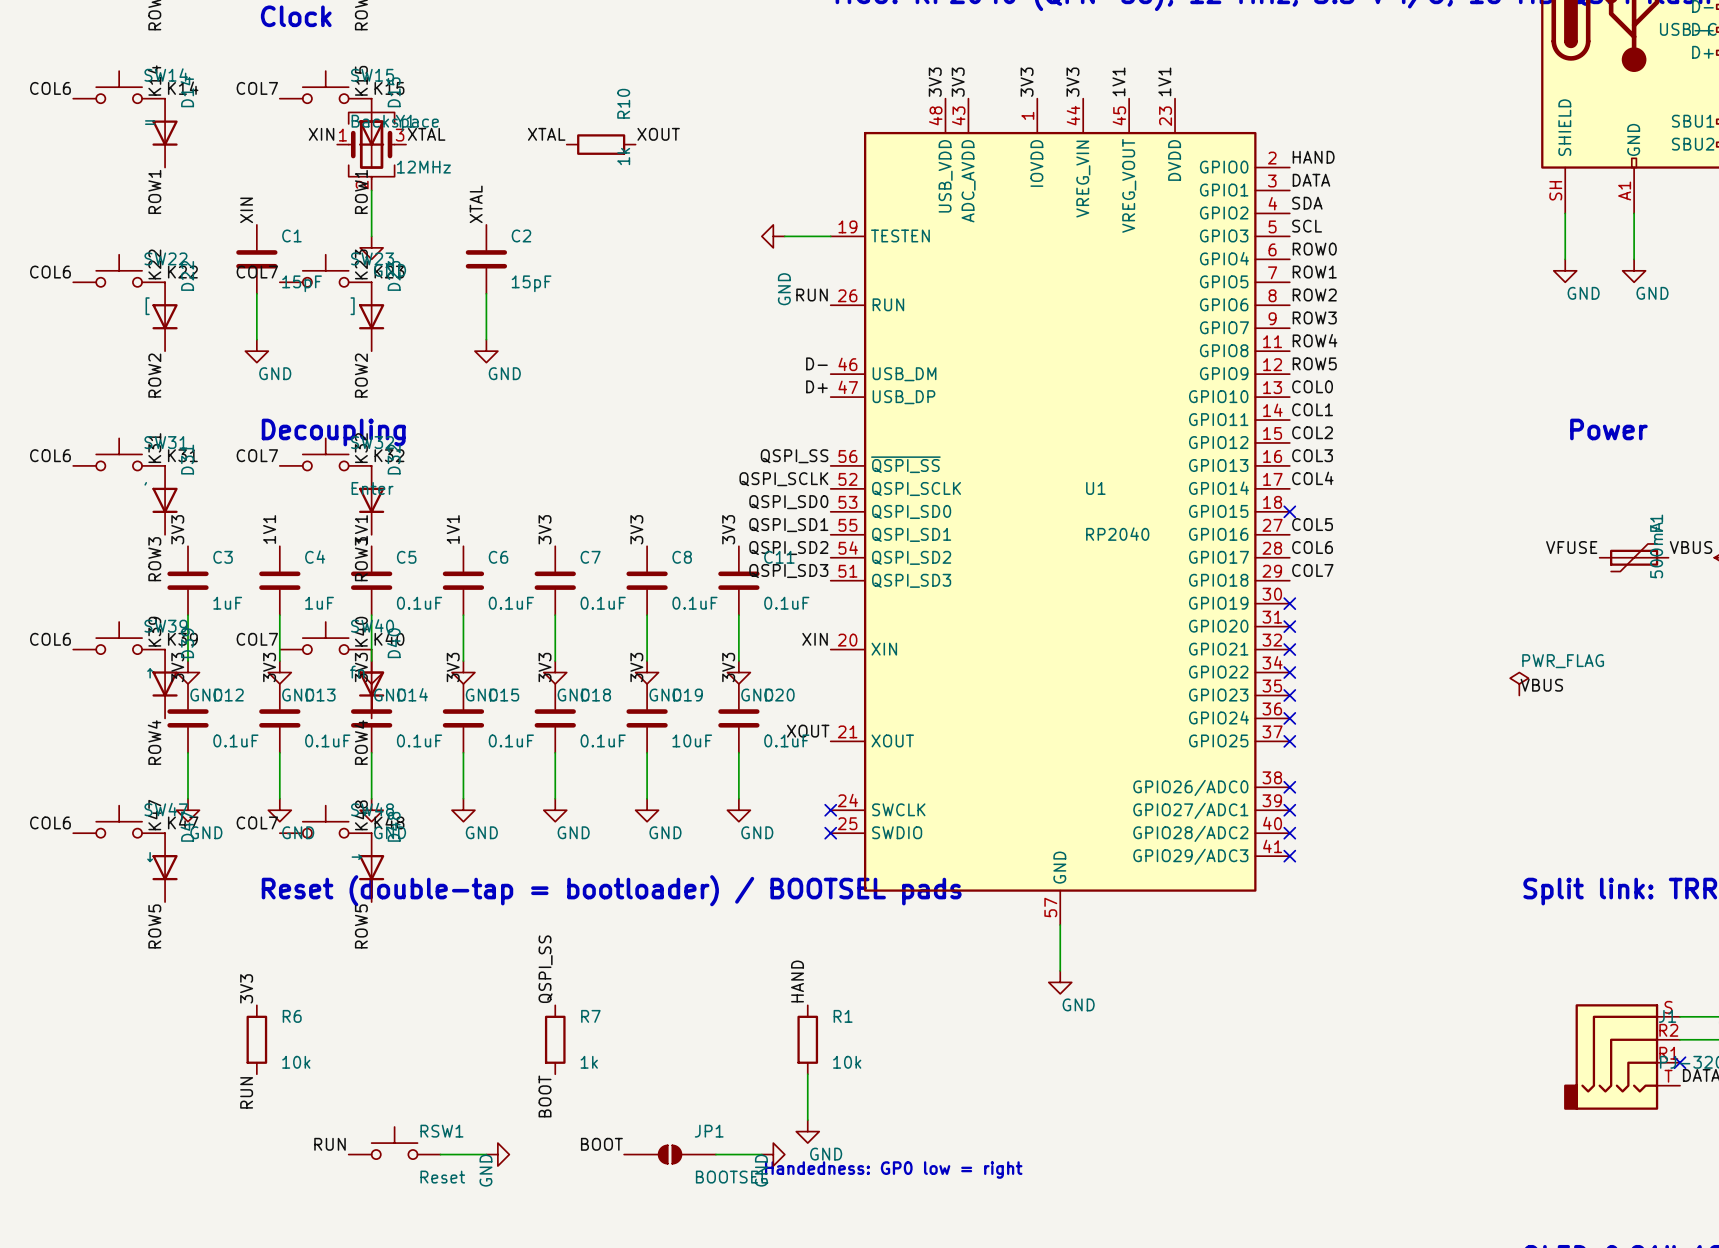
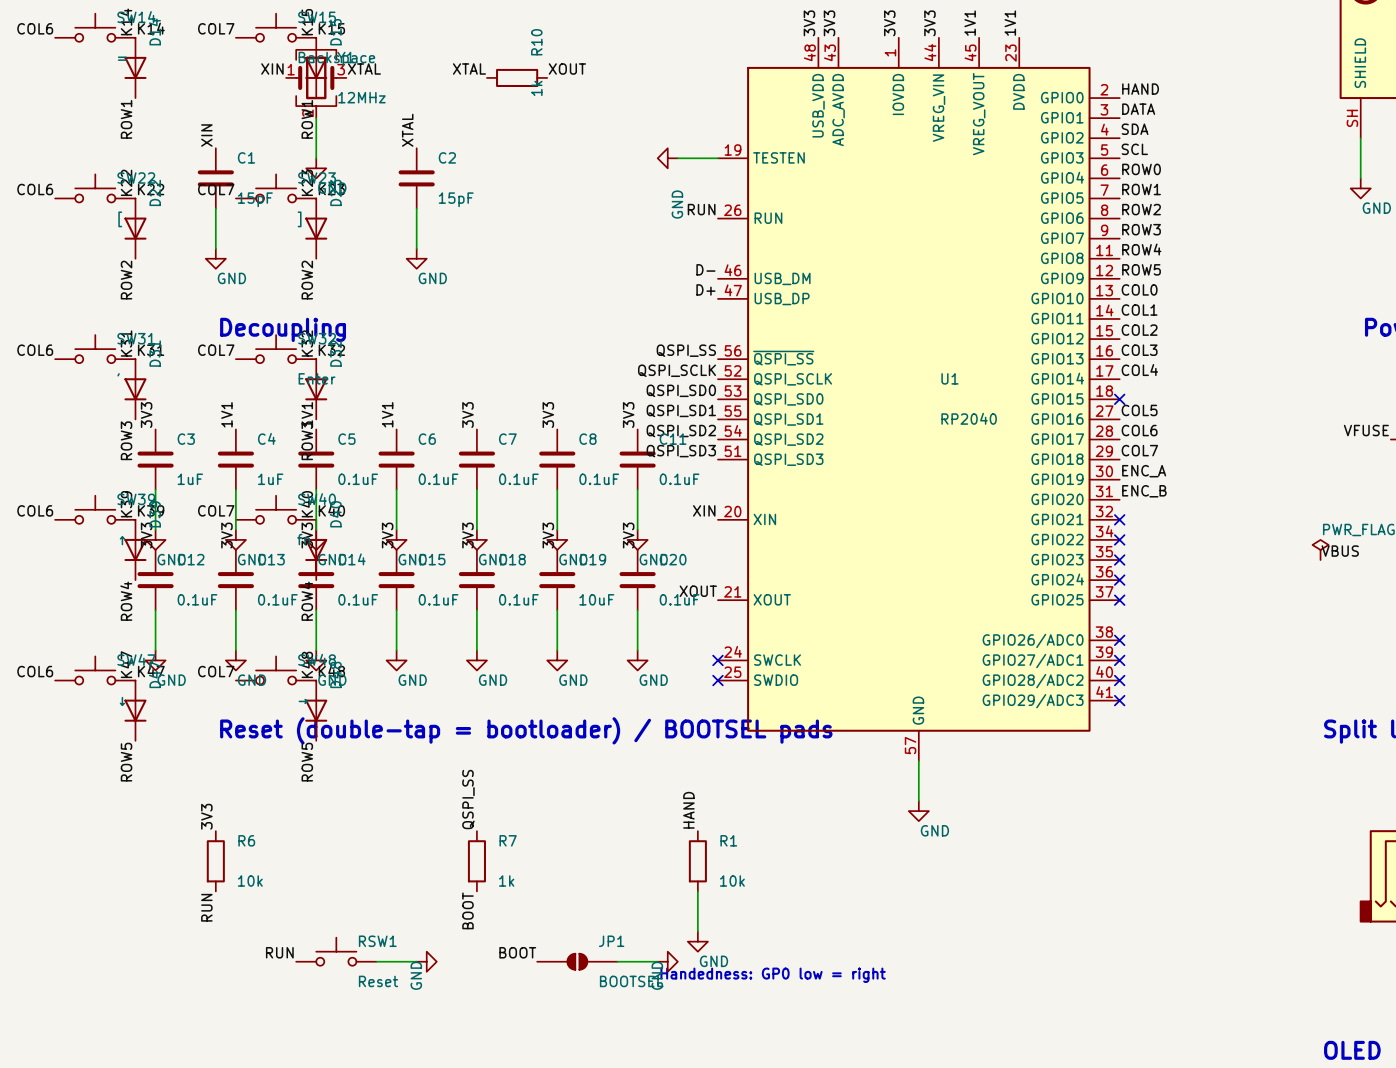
label: none -> ENC_A (1144, 471)
no-connect mark: (1289, 603) -> none
label: none -> ENC_B (1144, 491)
no-connect mark: (1289, 626) -> none

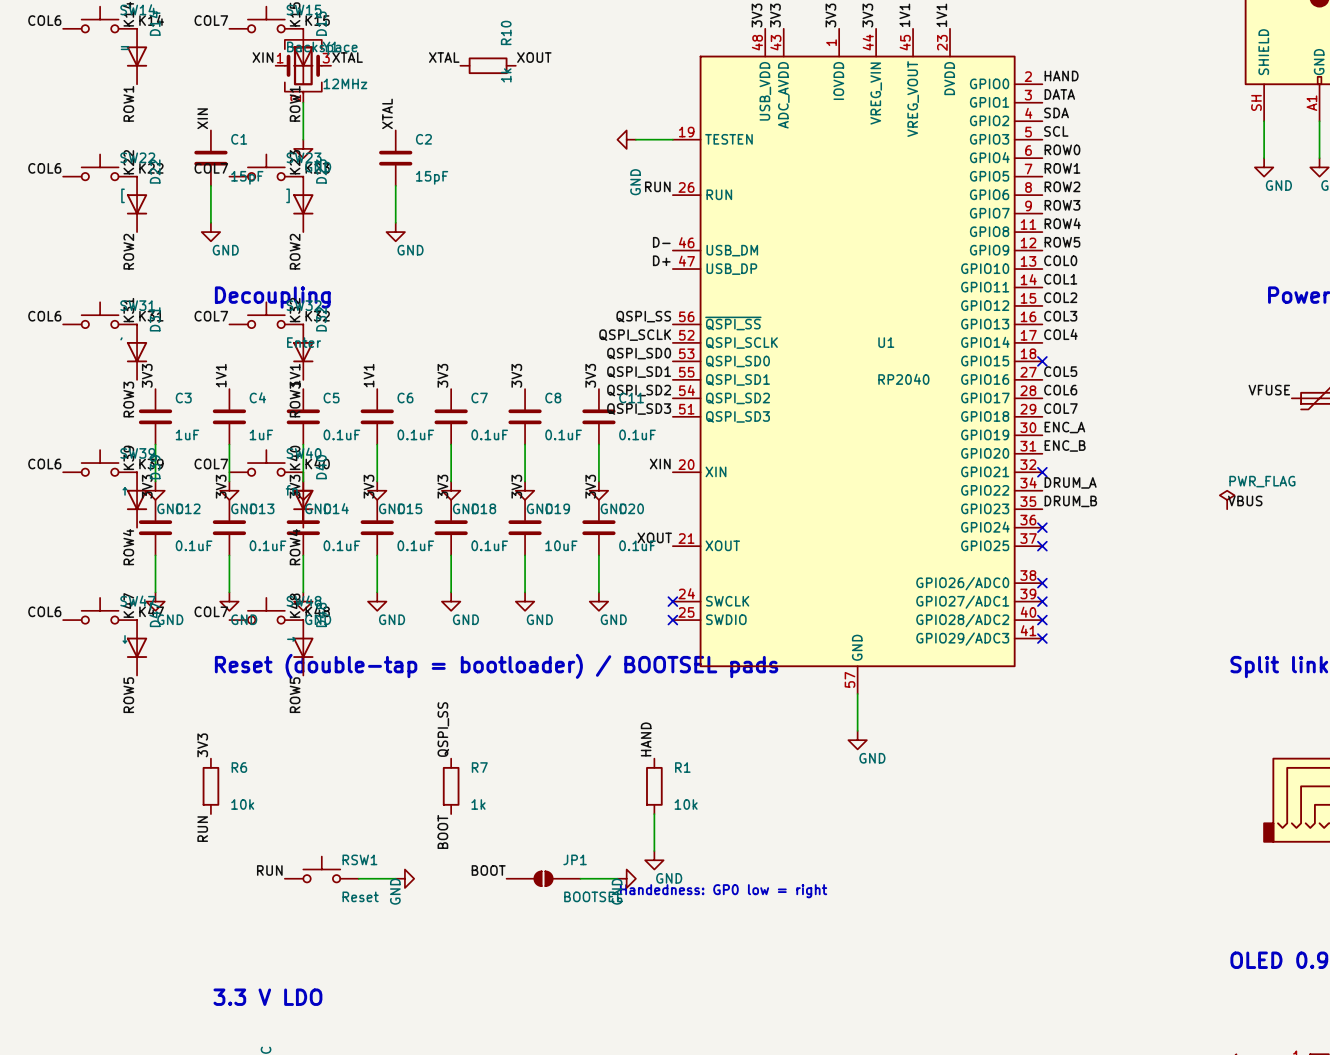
label: none -> DRUM_A (1070, 482)
no-connect mark: (1119, 539) -> none
label: none -> DRUM_B (1070, 501)
no-connect mark: (1119, 560) -> none

